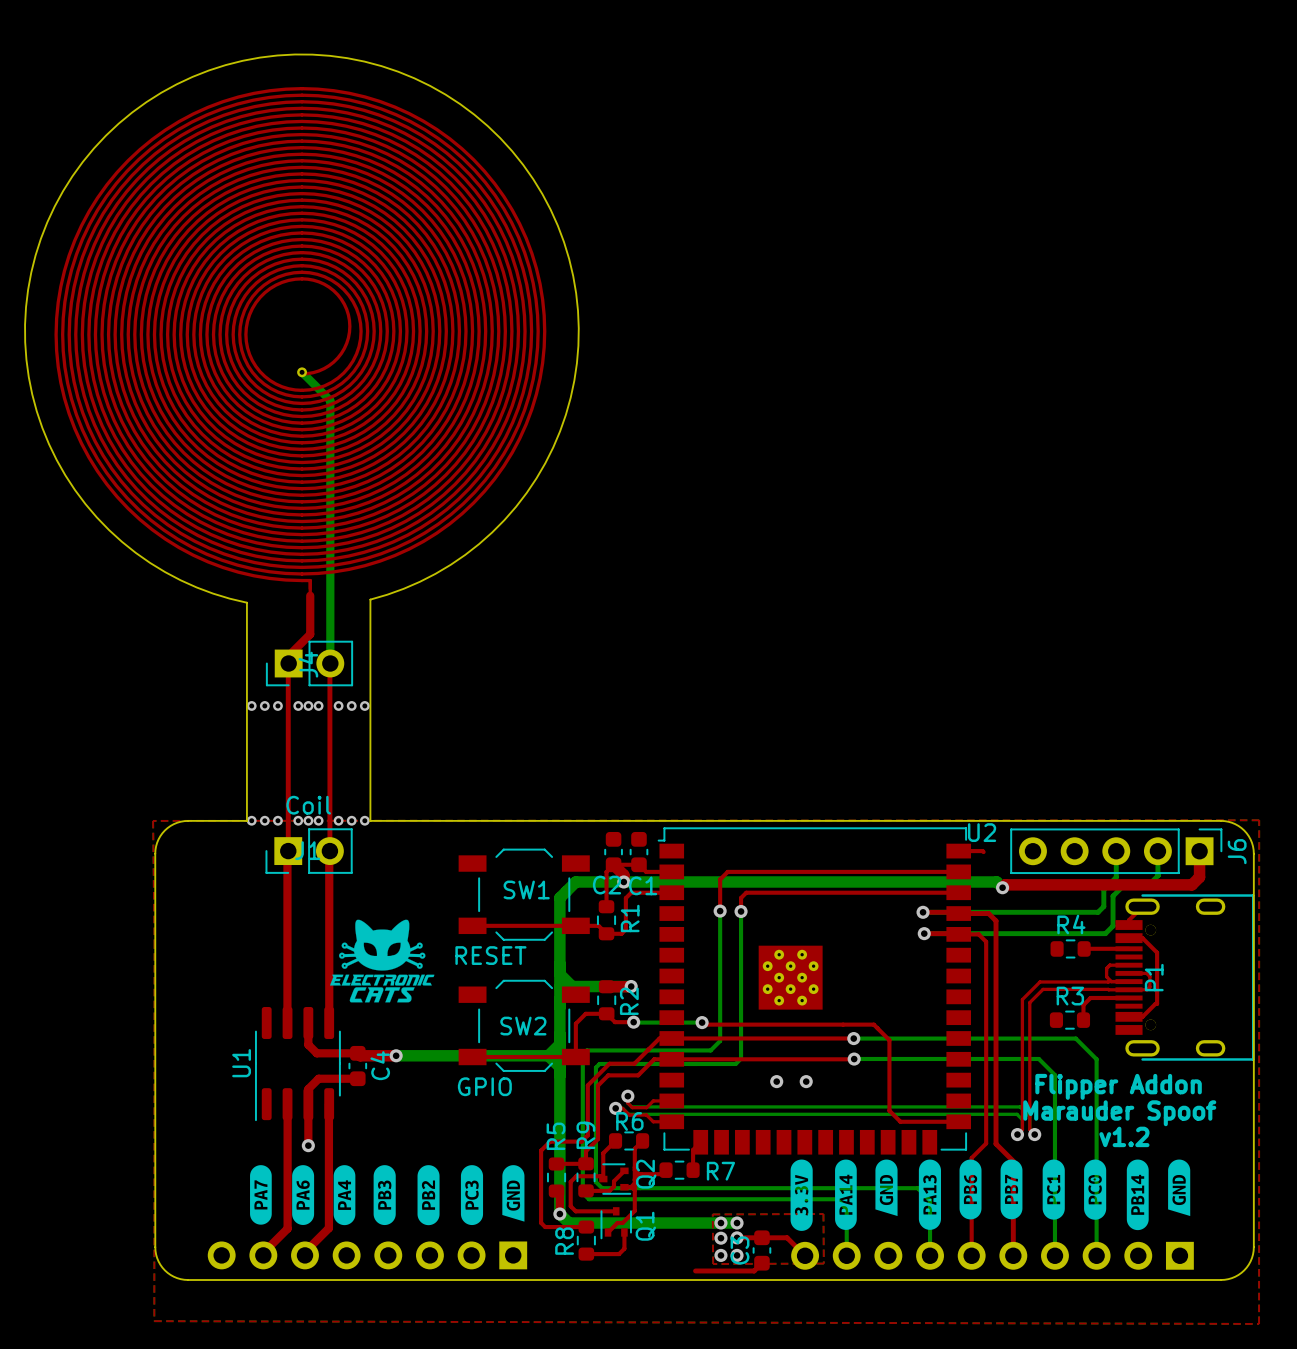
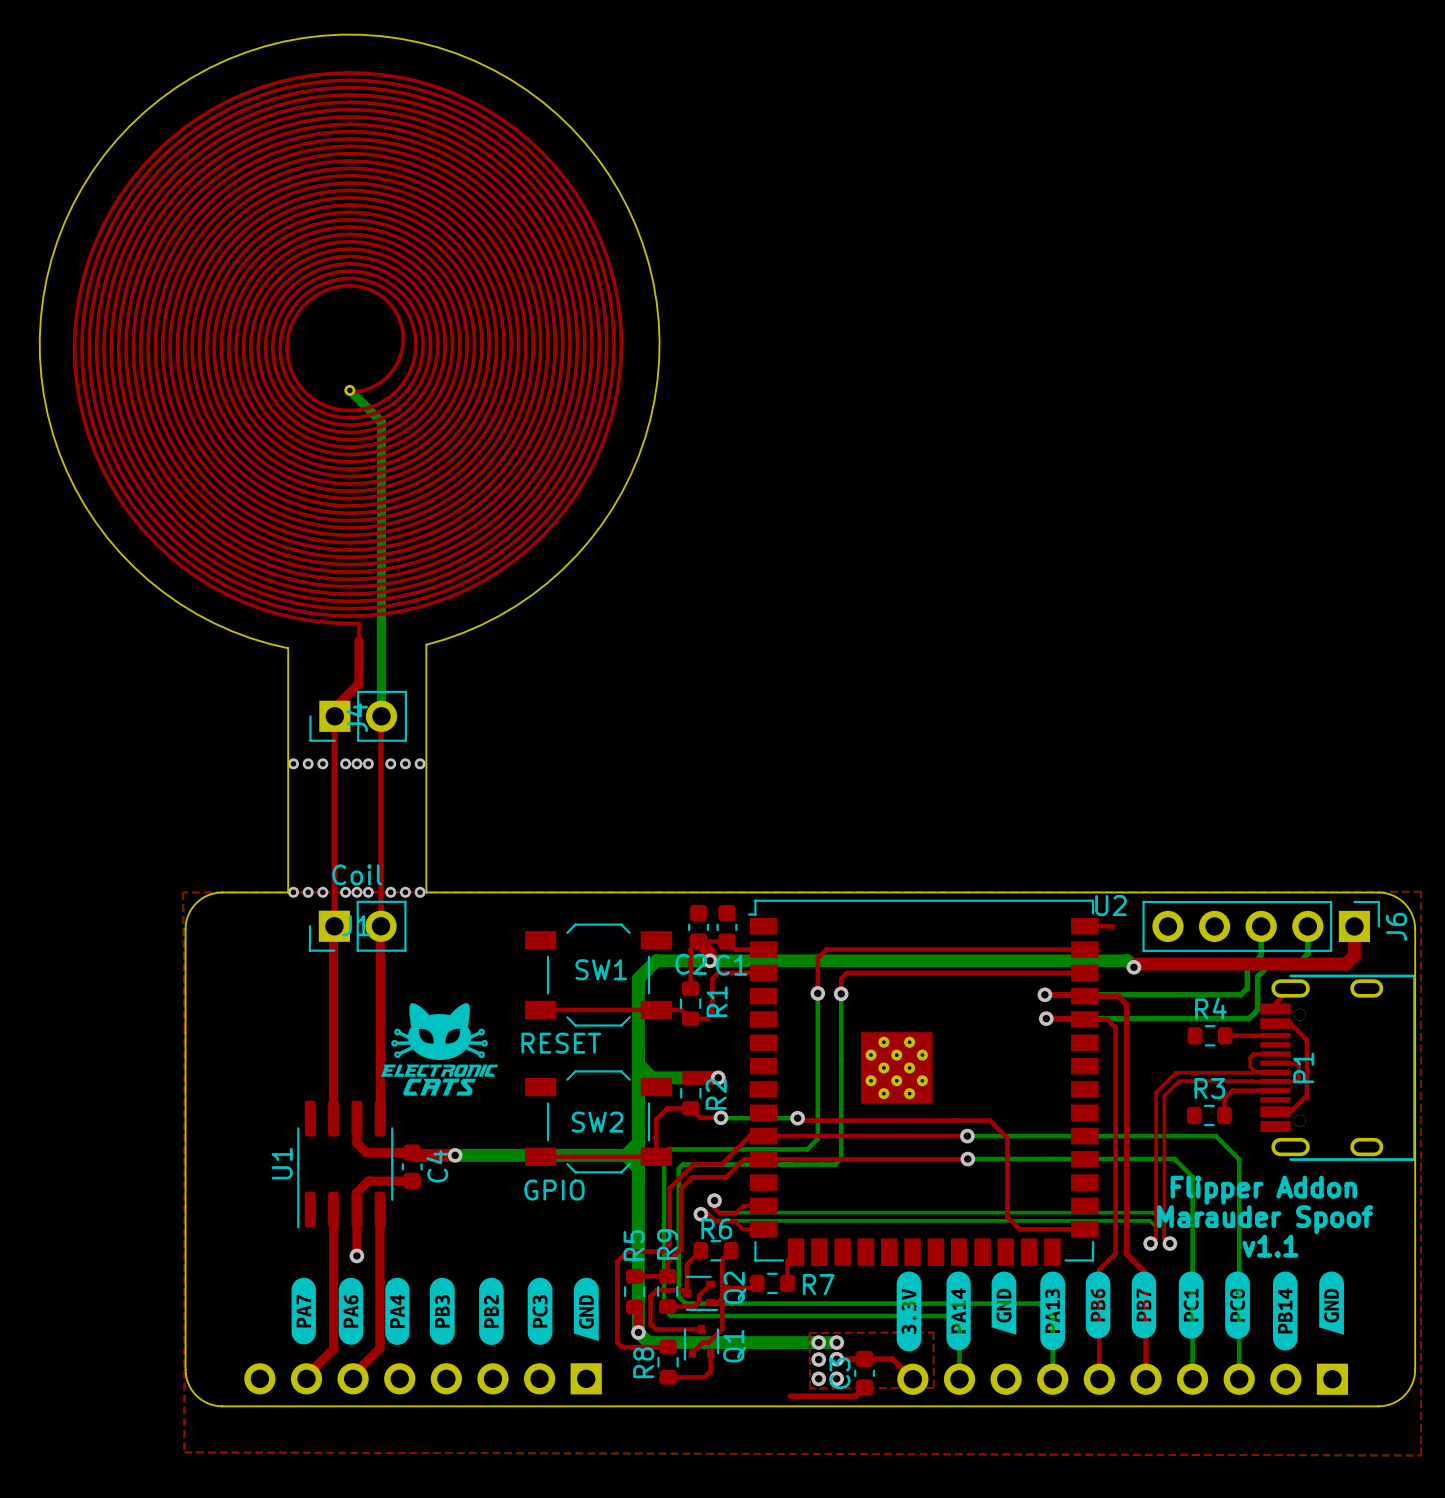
via: (776, 1081) -> none
via: (806, 1081) -> none
text: v1.2 (1124, 1136) -> v1.1 (1270, 1246)

